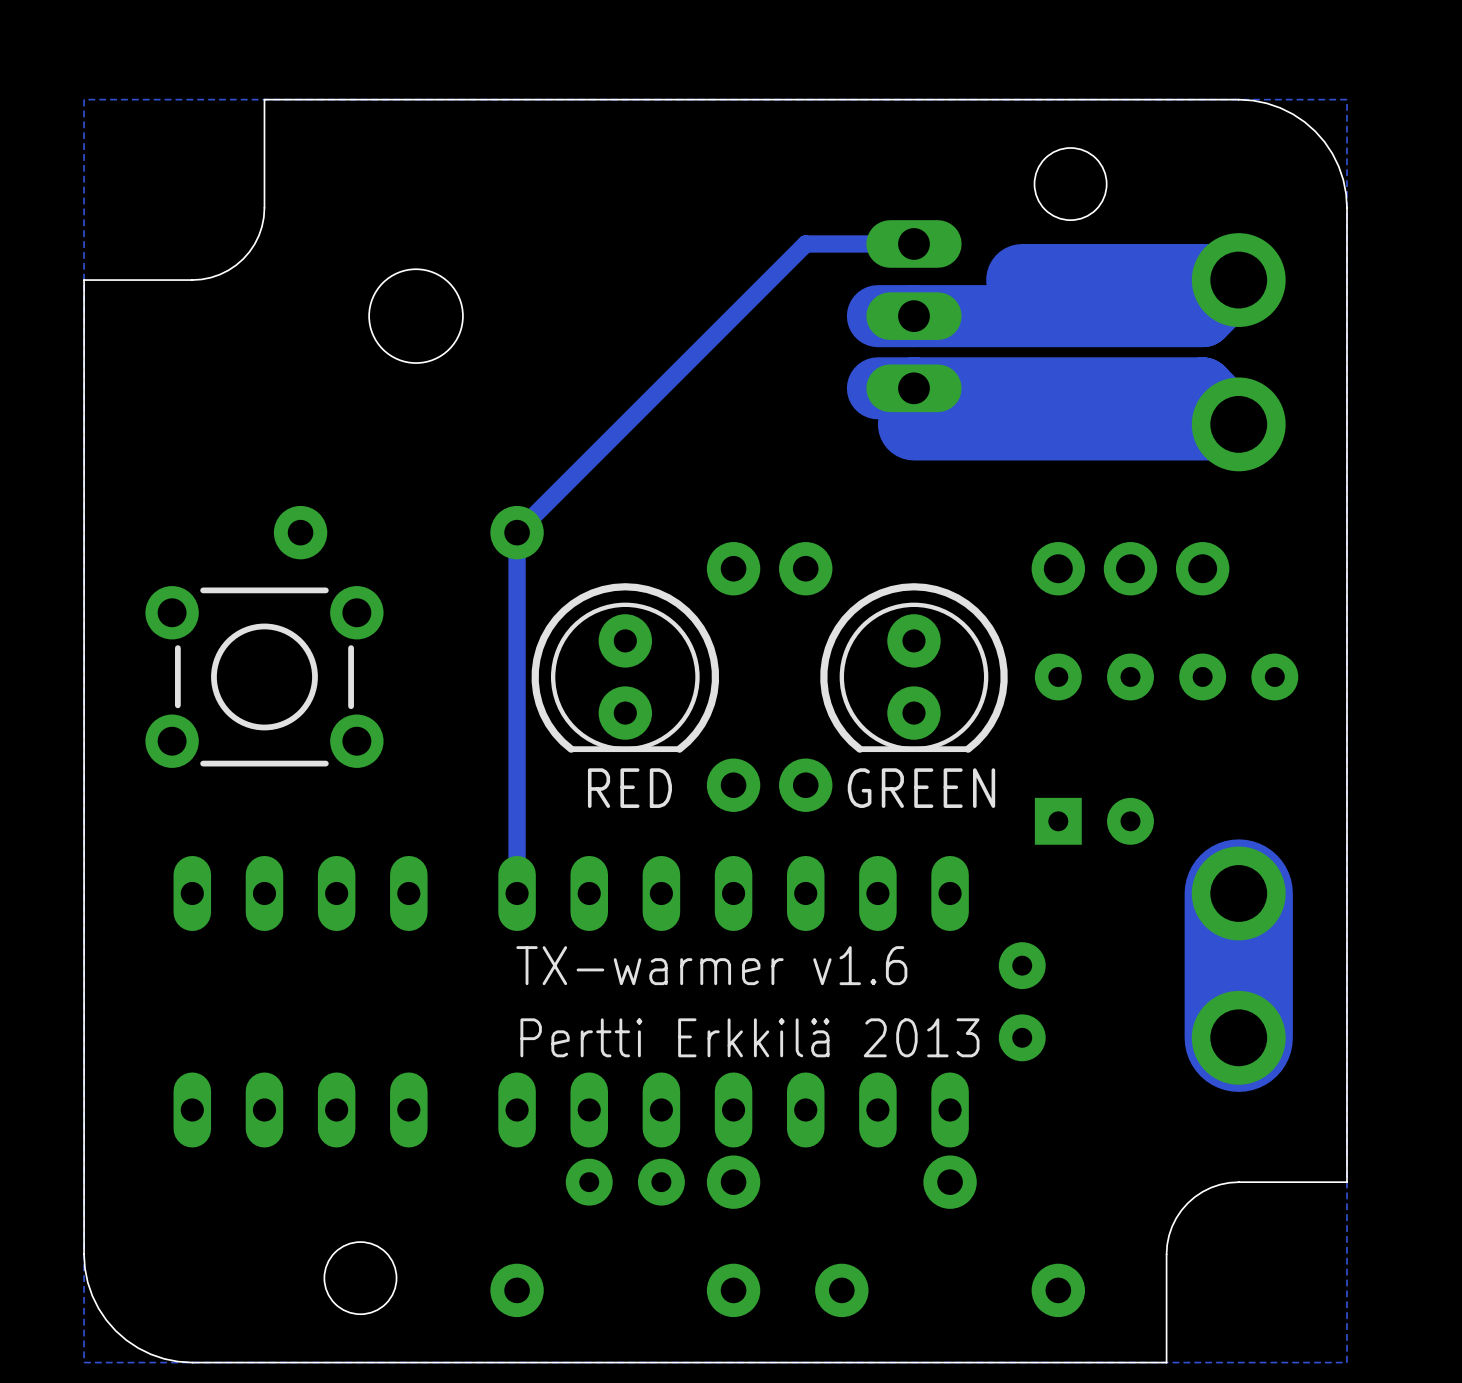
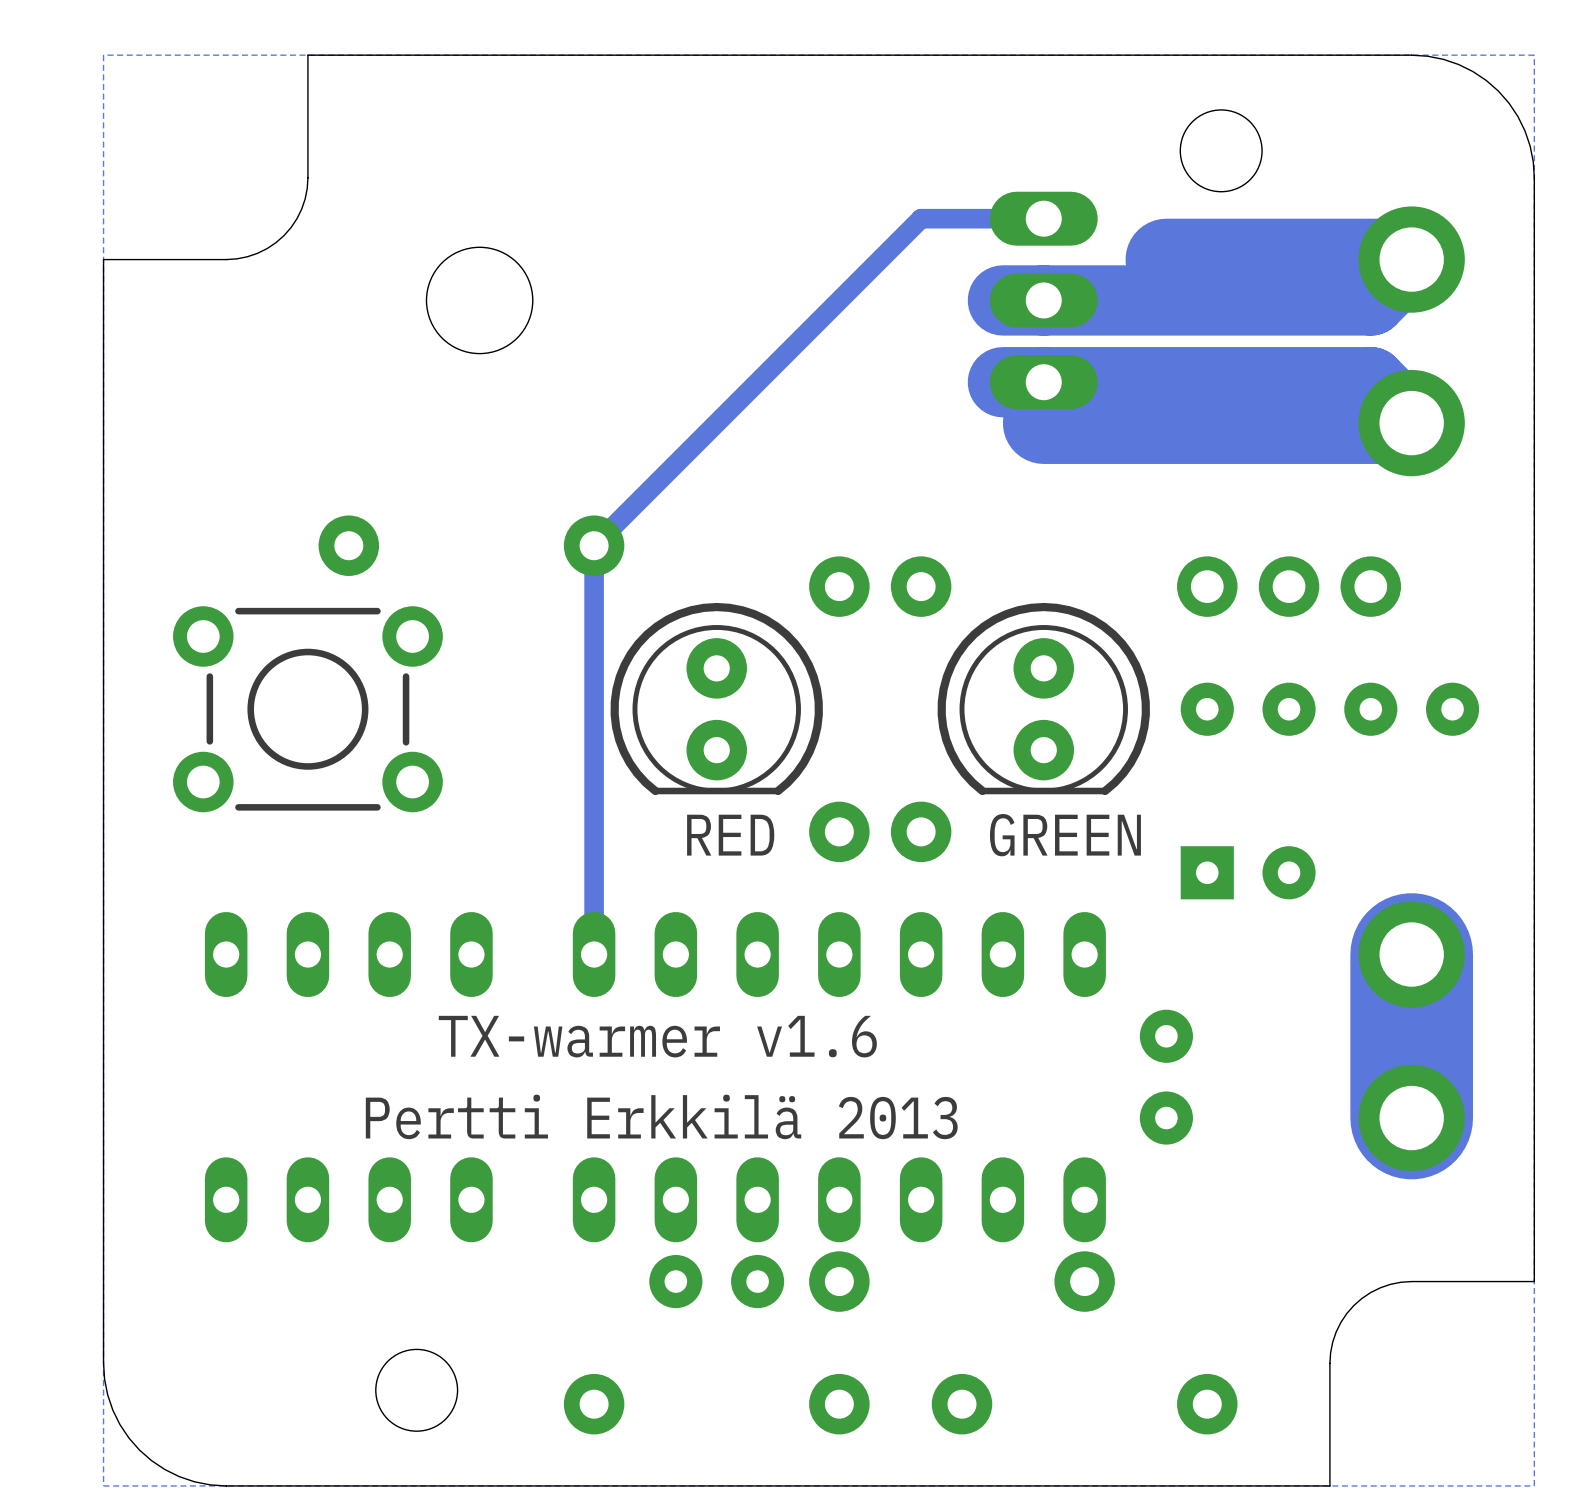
text position: TX-warmer v1.6 (711, 965) -> TX-warmer v1.6 (657, 1036)
text position: Pertti Erkkilä 2013 (749, 1037) -> Pertti Erkkilä 2013 (661, 1116)

